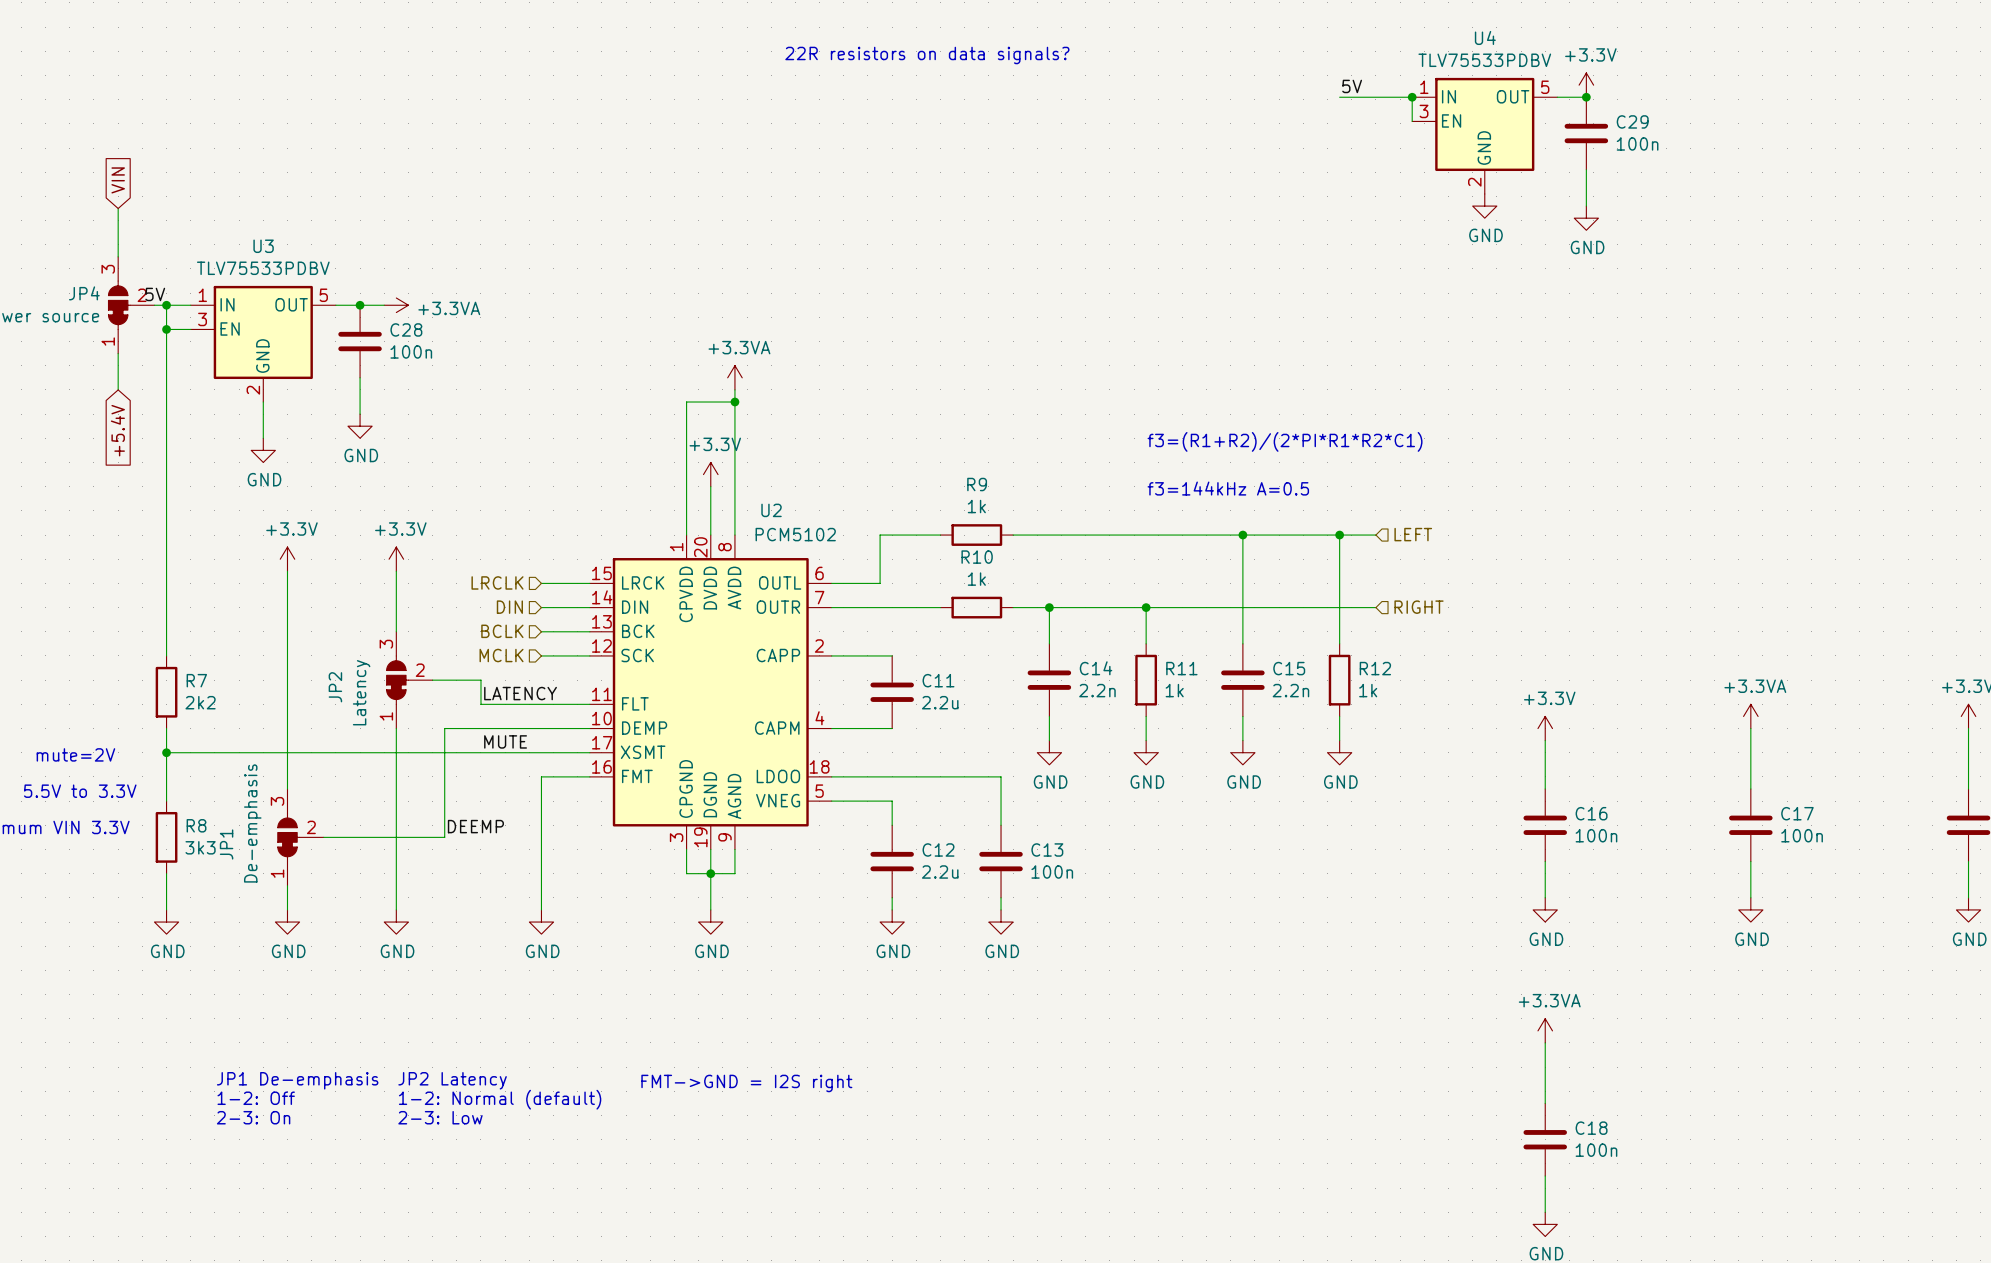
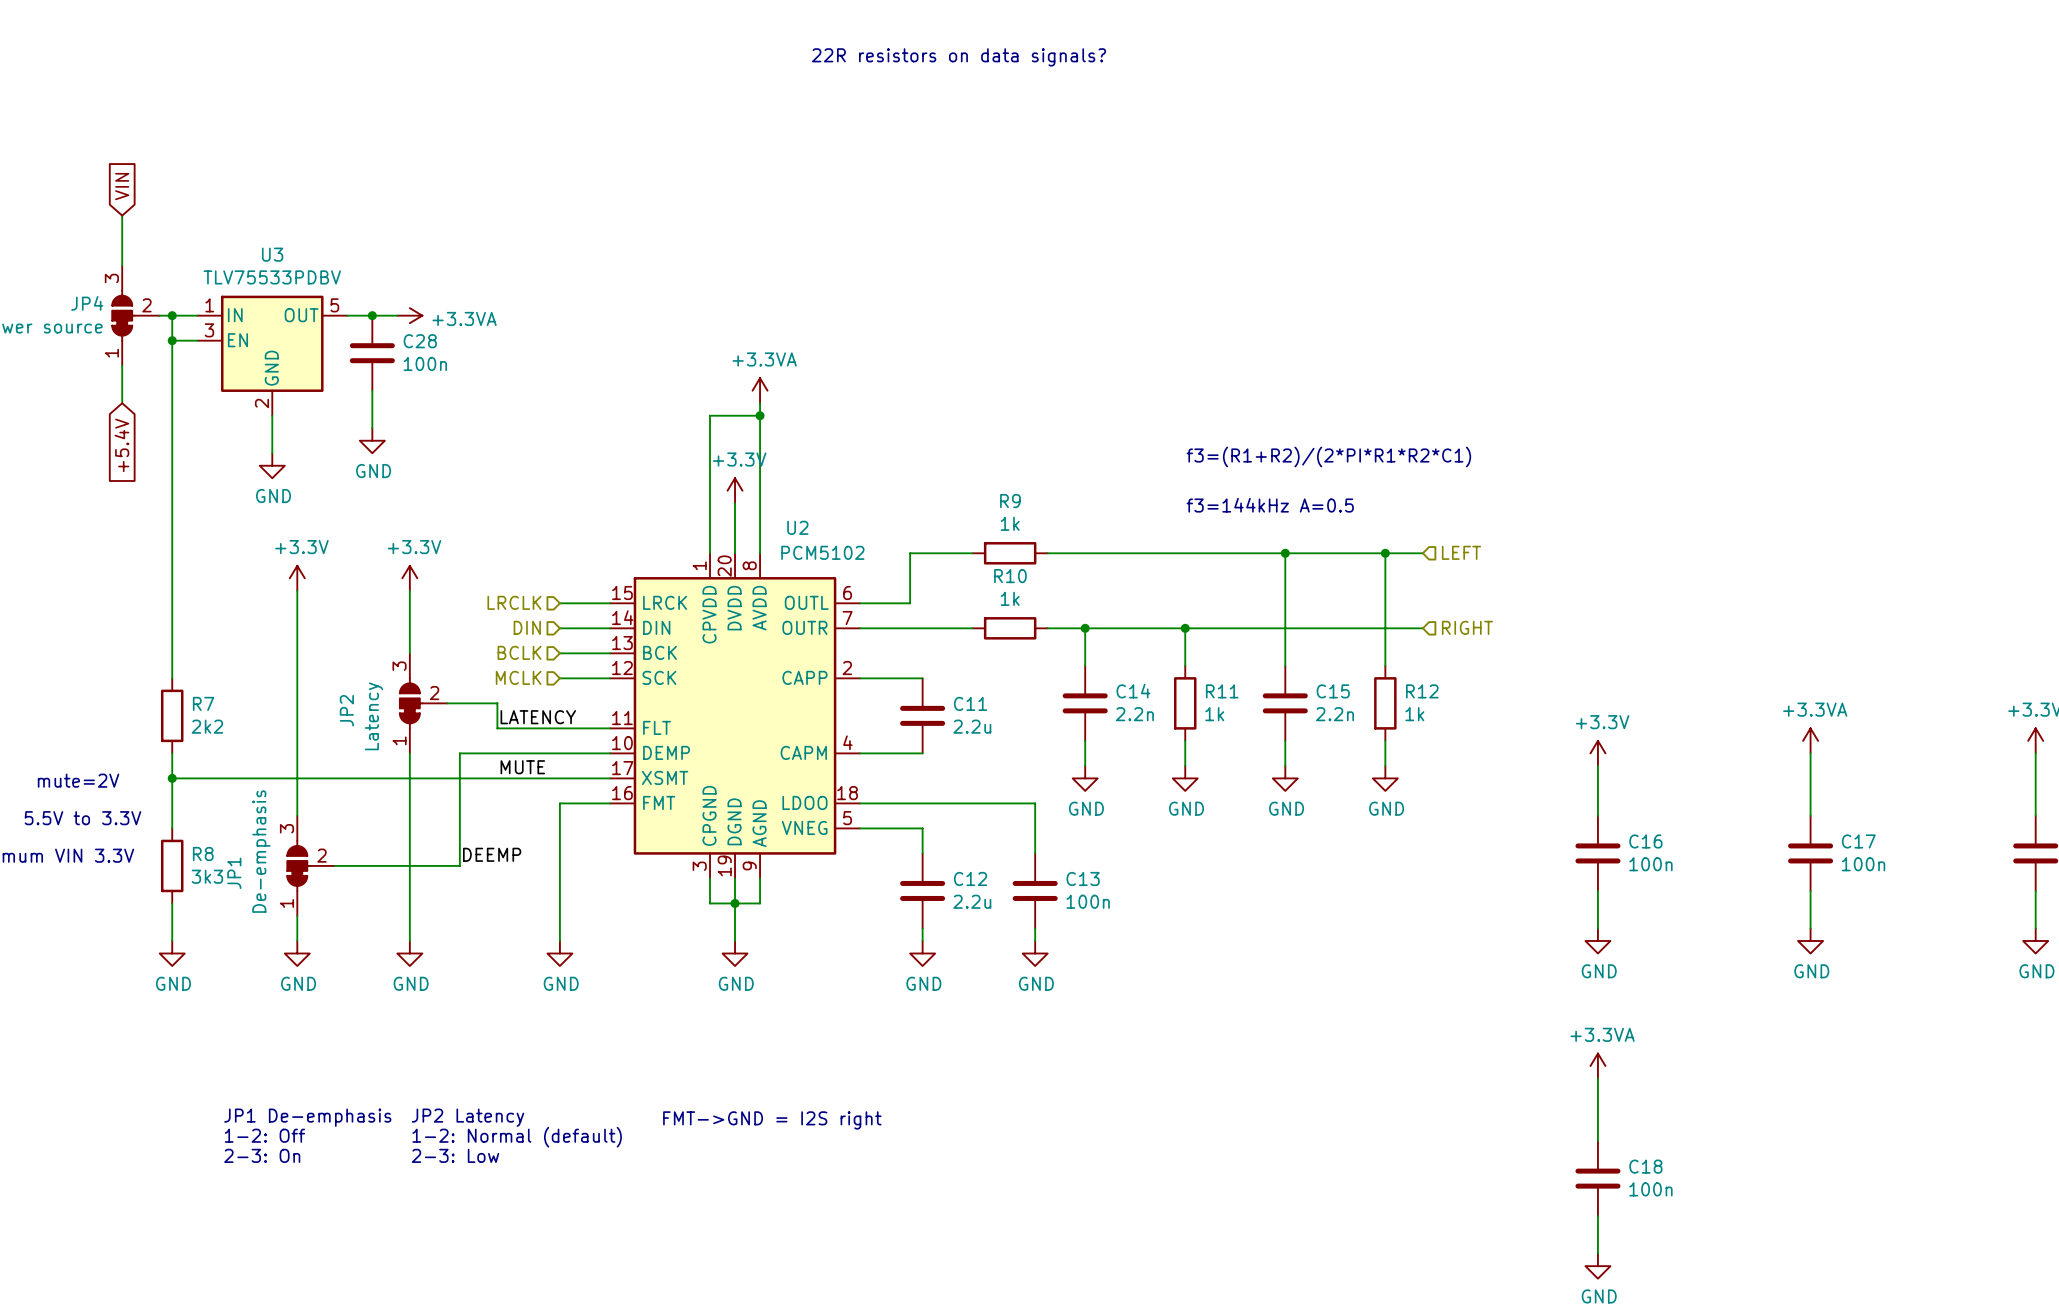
power symbol: +3.3V (1586, 85) -> none
label: 5V (1352, 86) -> none
wire: (1339, 97) (1412, 97) (1412, 121) -> none
junction: (1412, 97) -> none
wire: (1557, 97) (1586, 97) -> none
junction: (1586, 97) -> none
C29: 100n (1586, 133) -> none
U4: TLV75533PDBV (1484, 135) -> none
wire: (1586, 169) (1586, 206) -> none
power symbol: GND (1484, 206) -> none
power symbol: GND (1586, 218) -> none
label: 5V (155, 294) -> none

